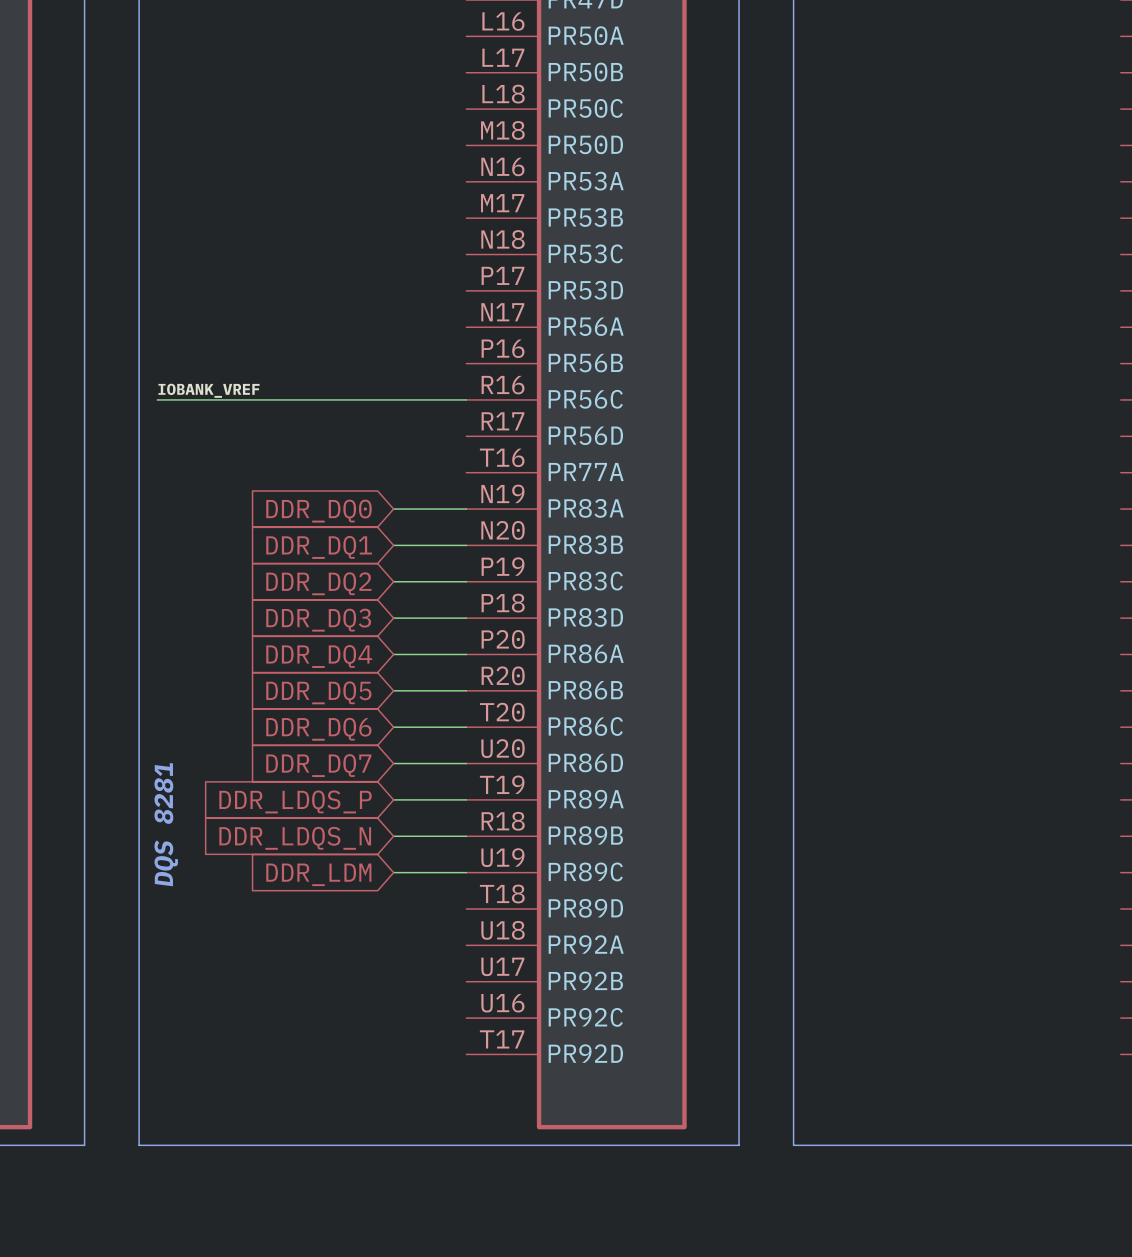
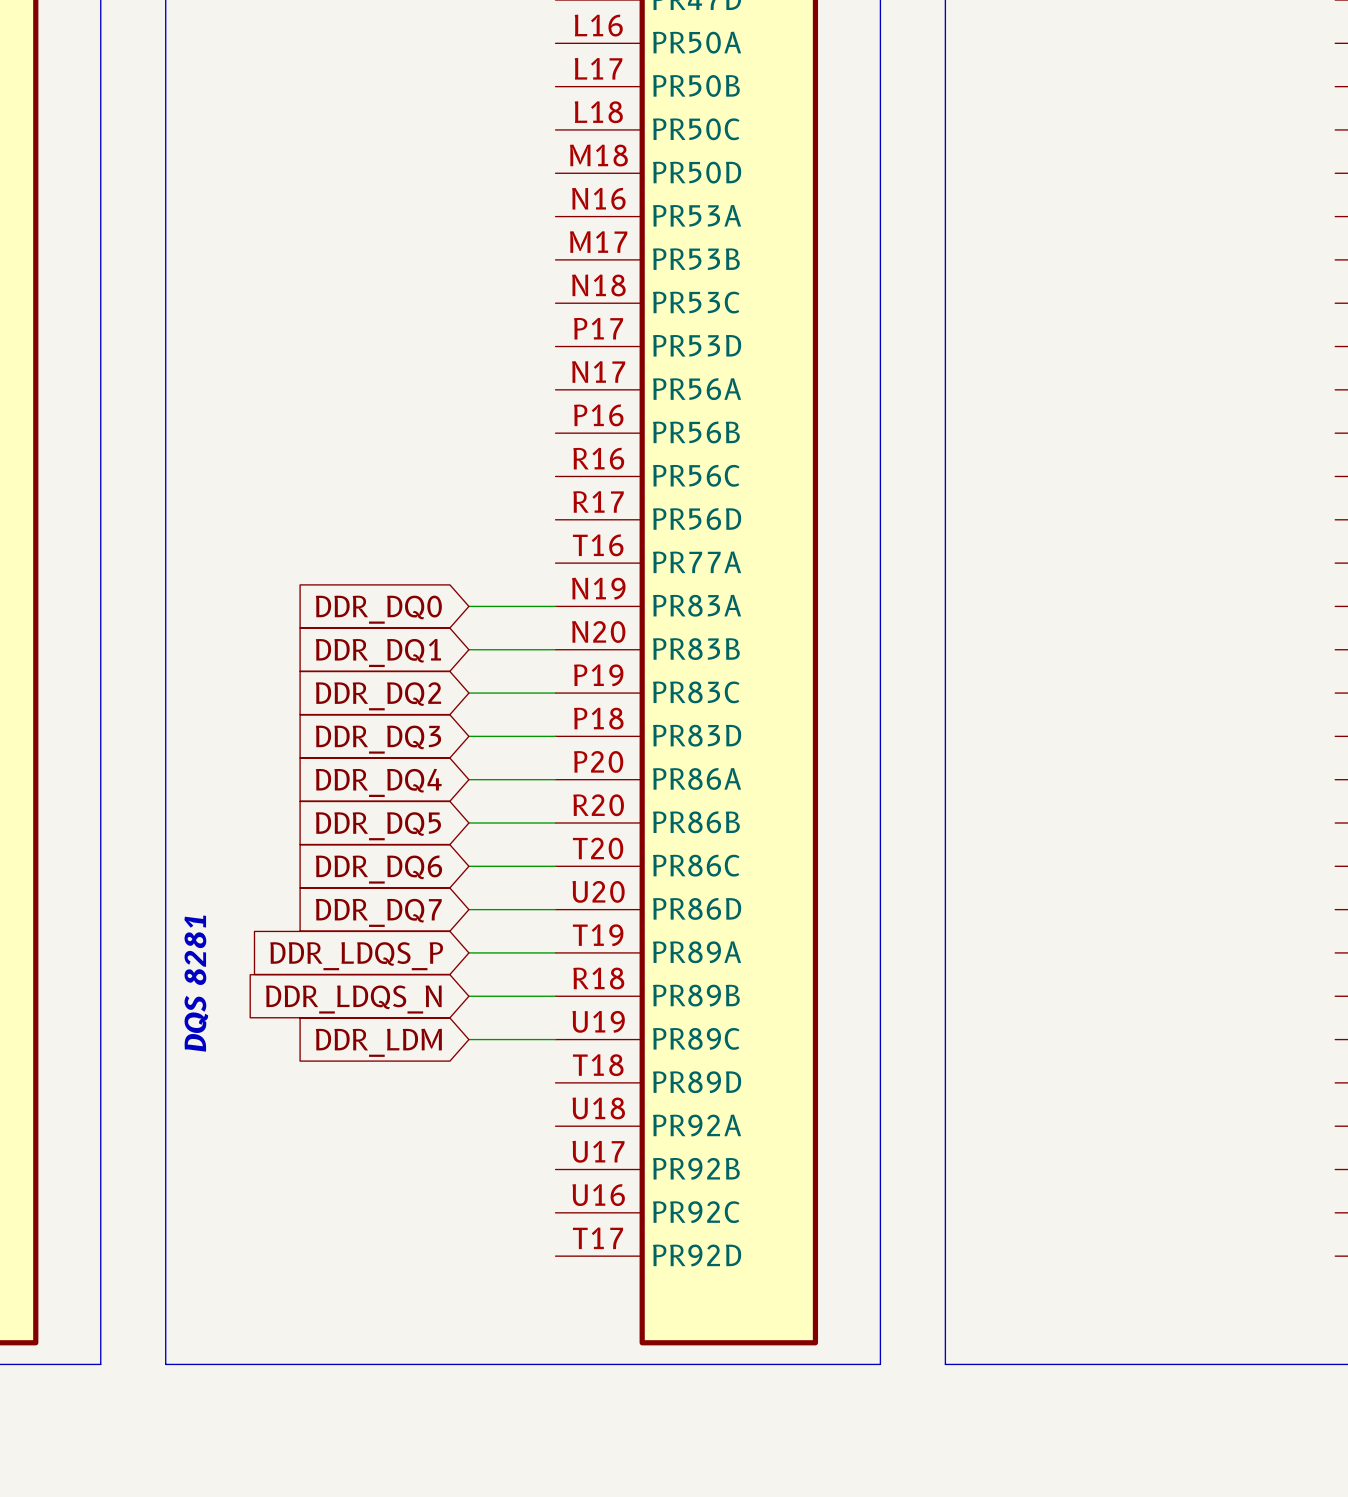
label: IOBANK_VREF (208, 390) -> none
wire: (157, 399) (466, 399) -> none

